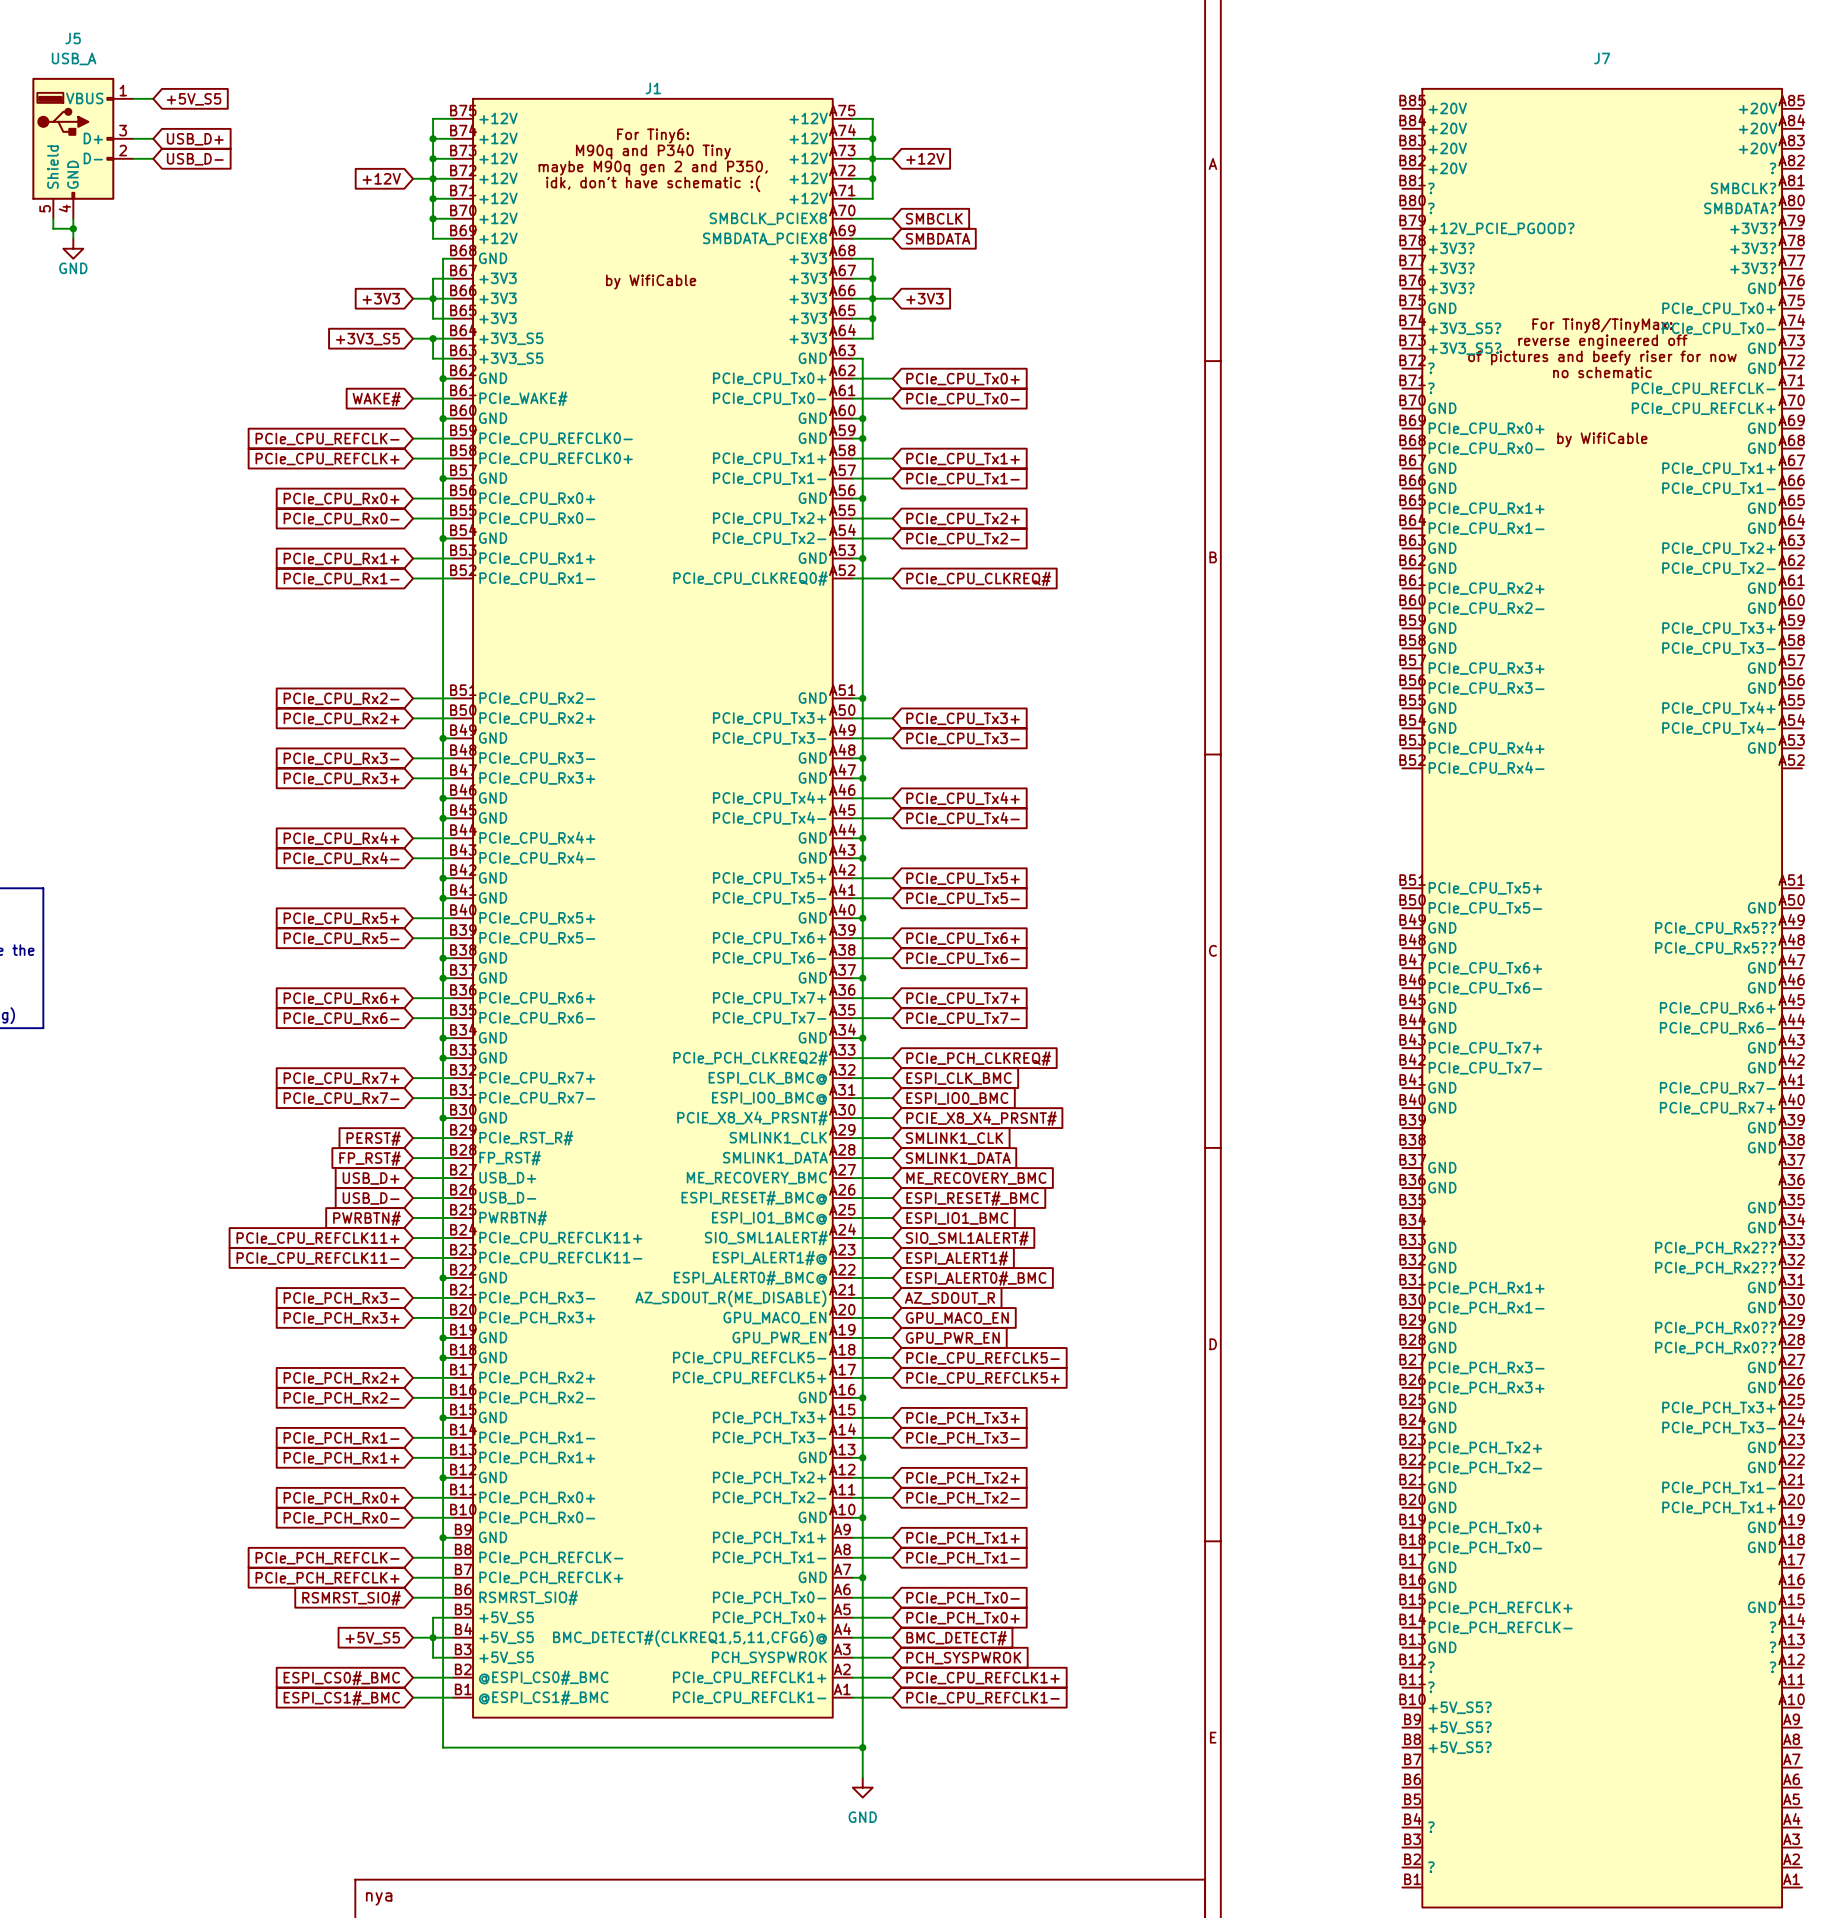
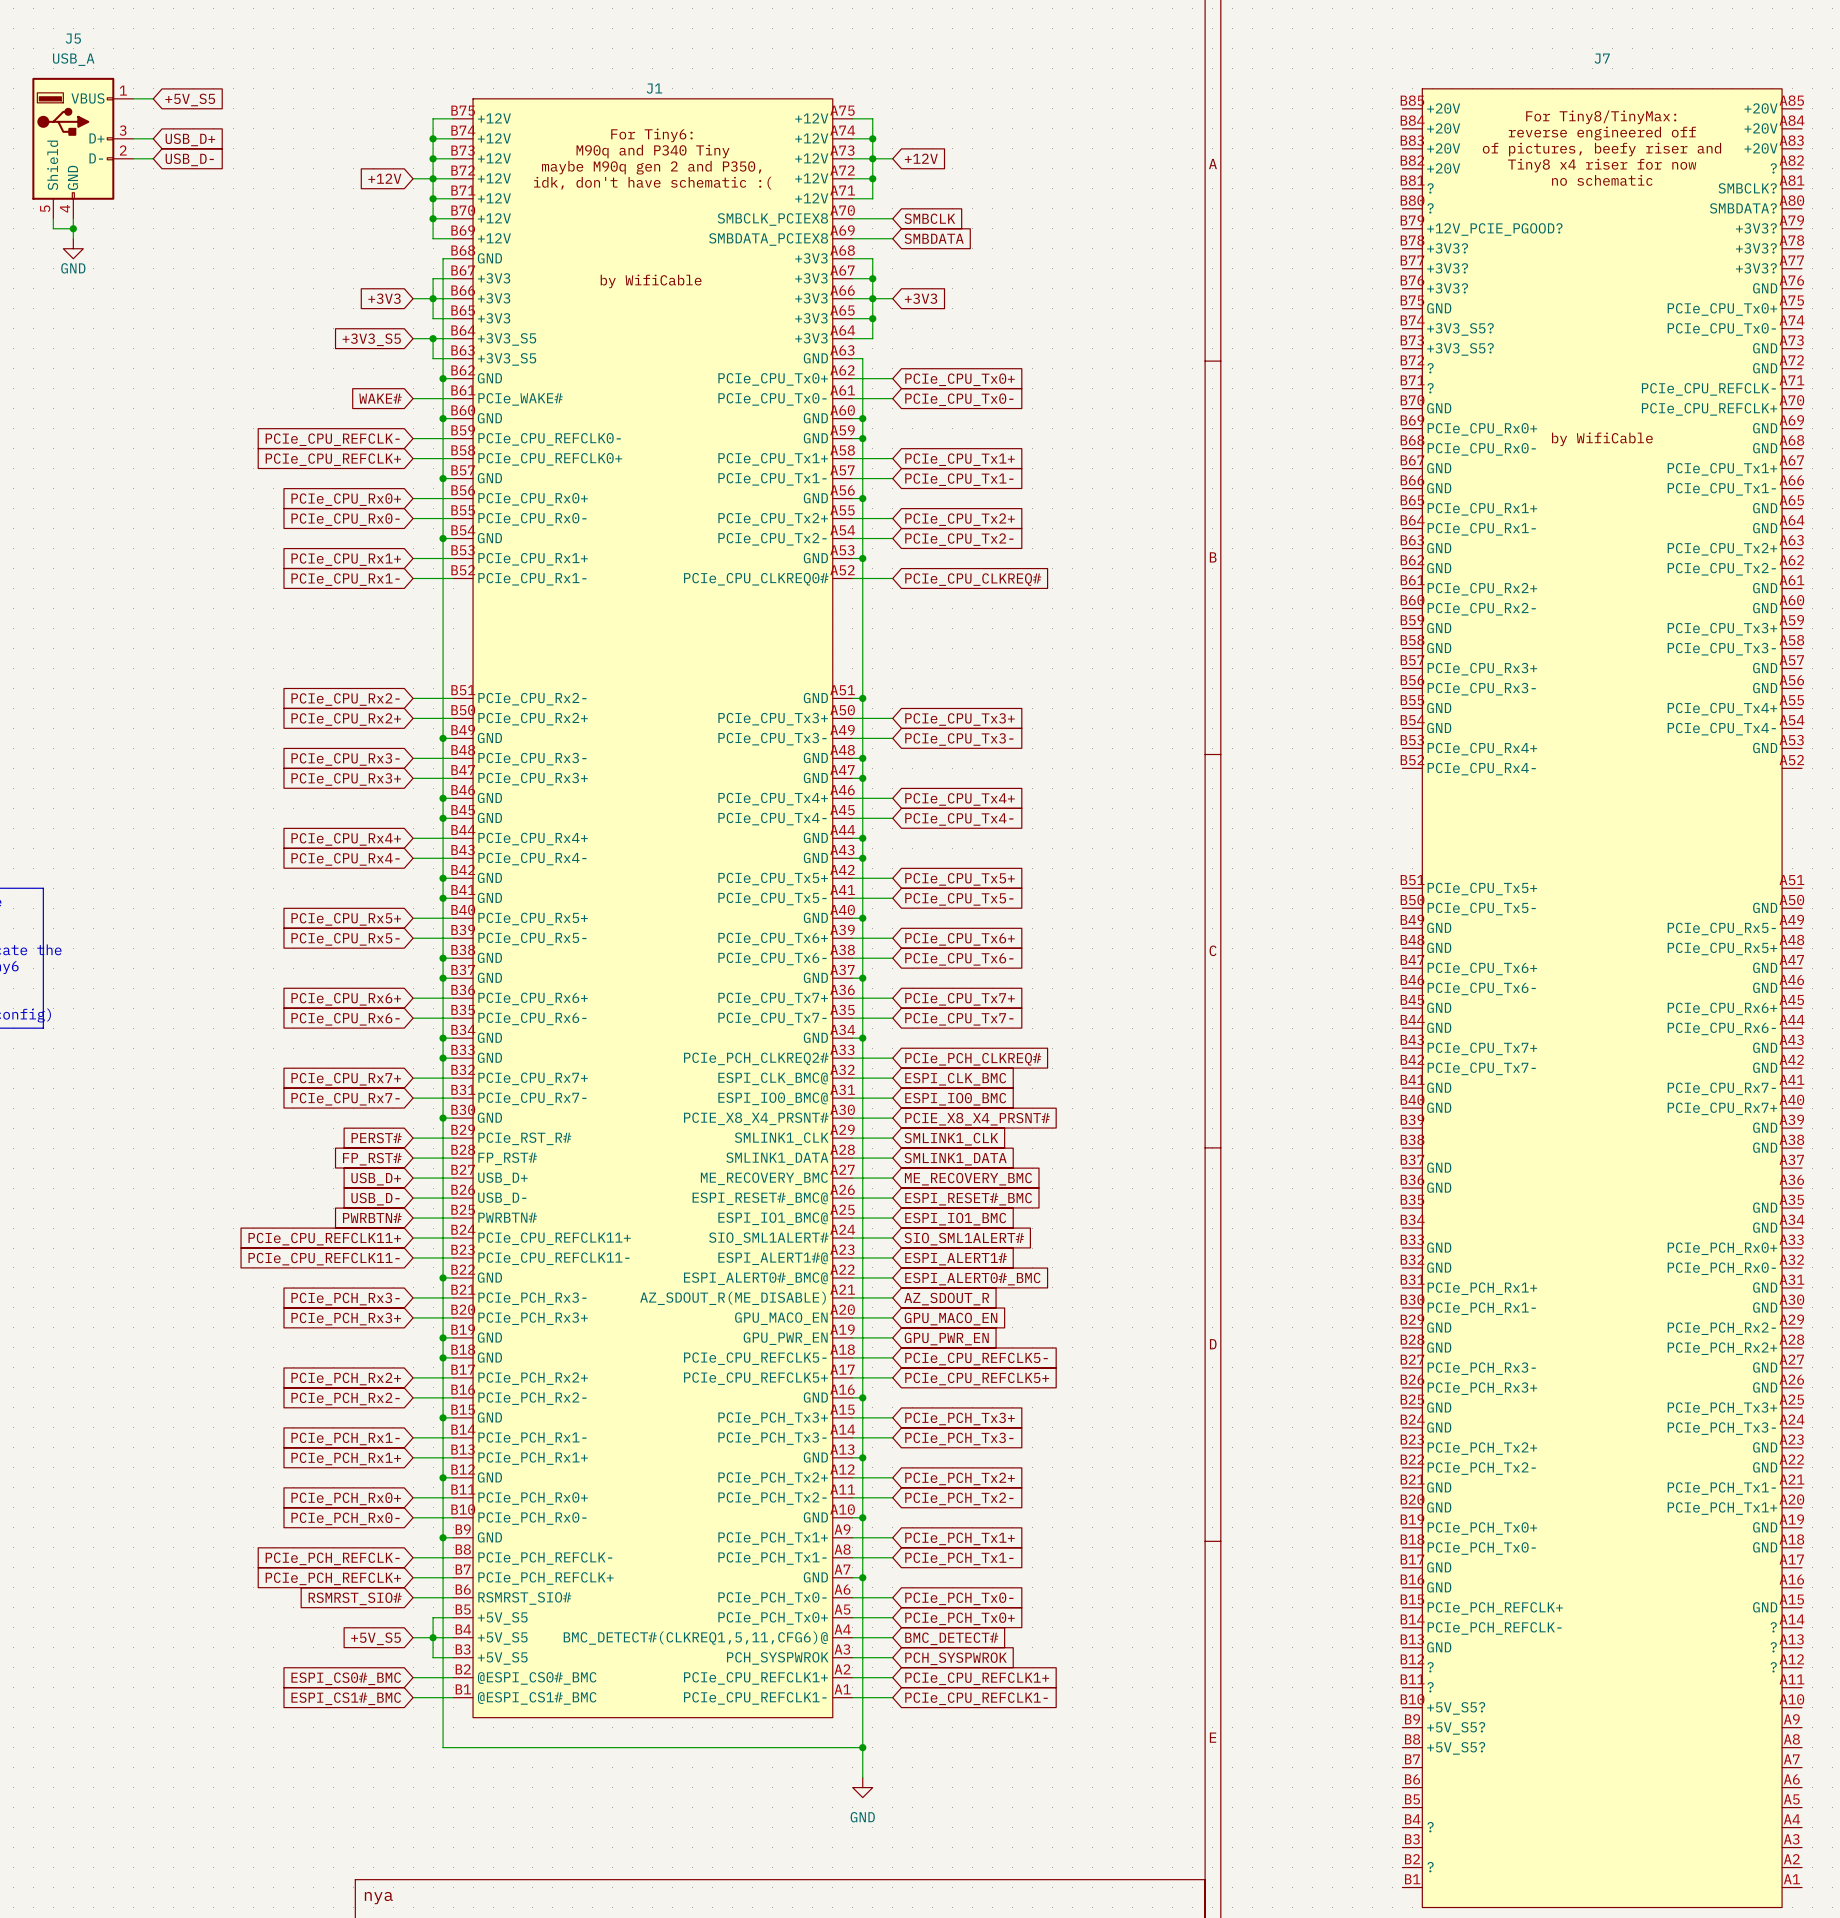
J7 symbol: [1402, 88, 1803, 1908] -> [1402, 88, 1803, 1908]

